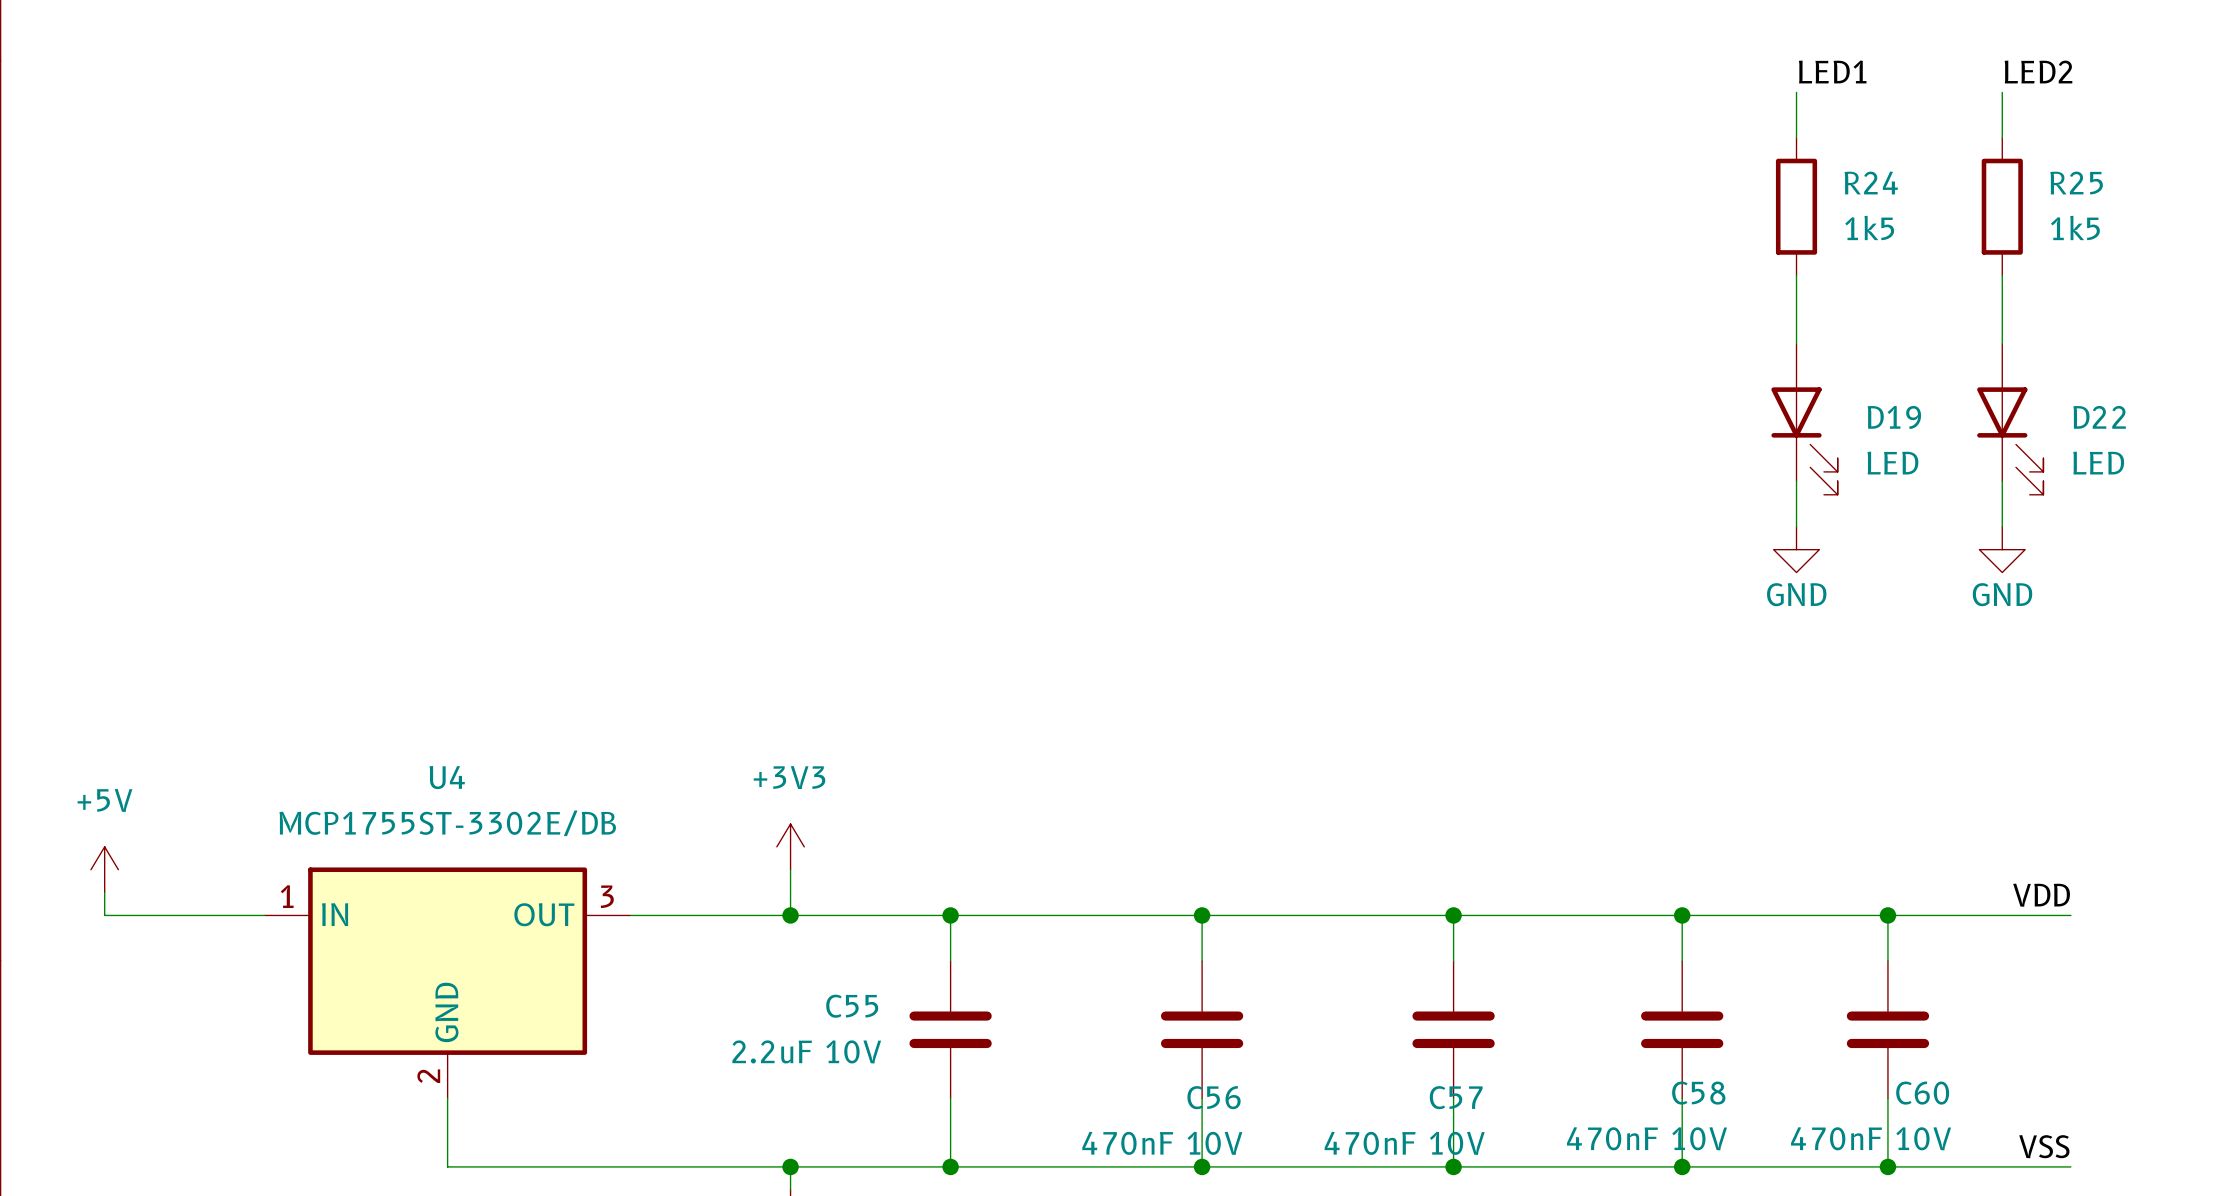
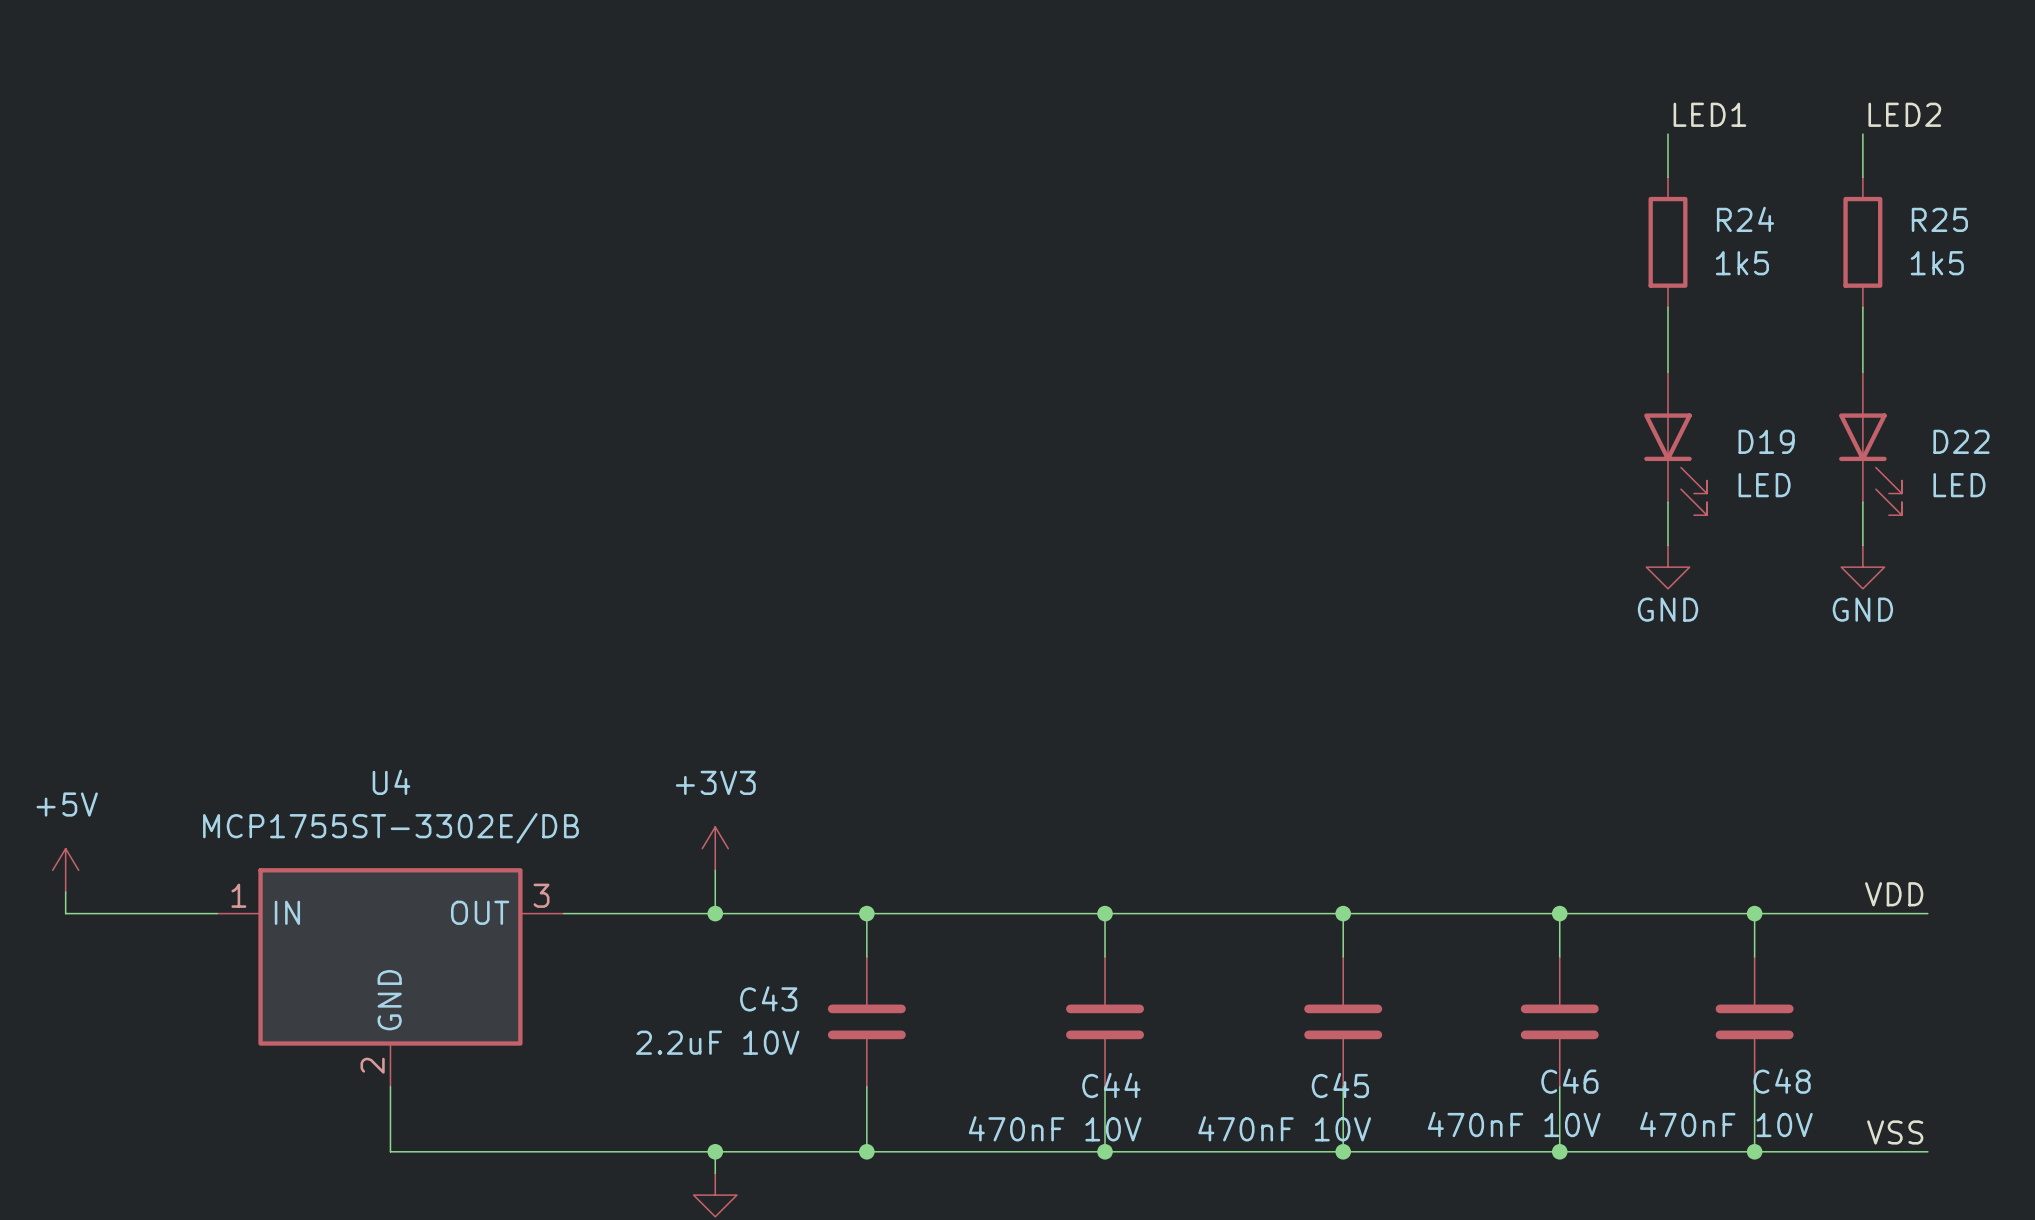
C55 name: C55 (852, 1006) -> C43 (768, 998)
C58 name: C58 (1698, 1093) -> C46 (1569, 1081)
C60 name: C60 (1922, 1093) -> C48 (1782, 1081)
C56 name: C56 (1214, 1097) -> C44 (1111, 1085)
C57 name: C57 (1456, 1097) -> C45 (1340, 1085)

